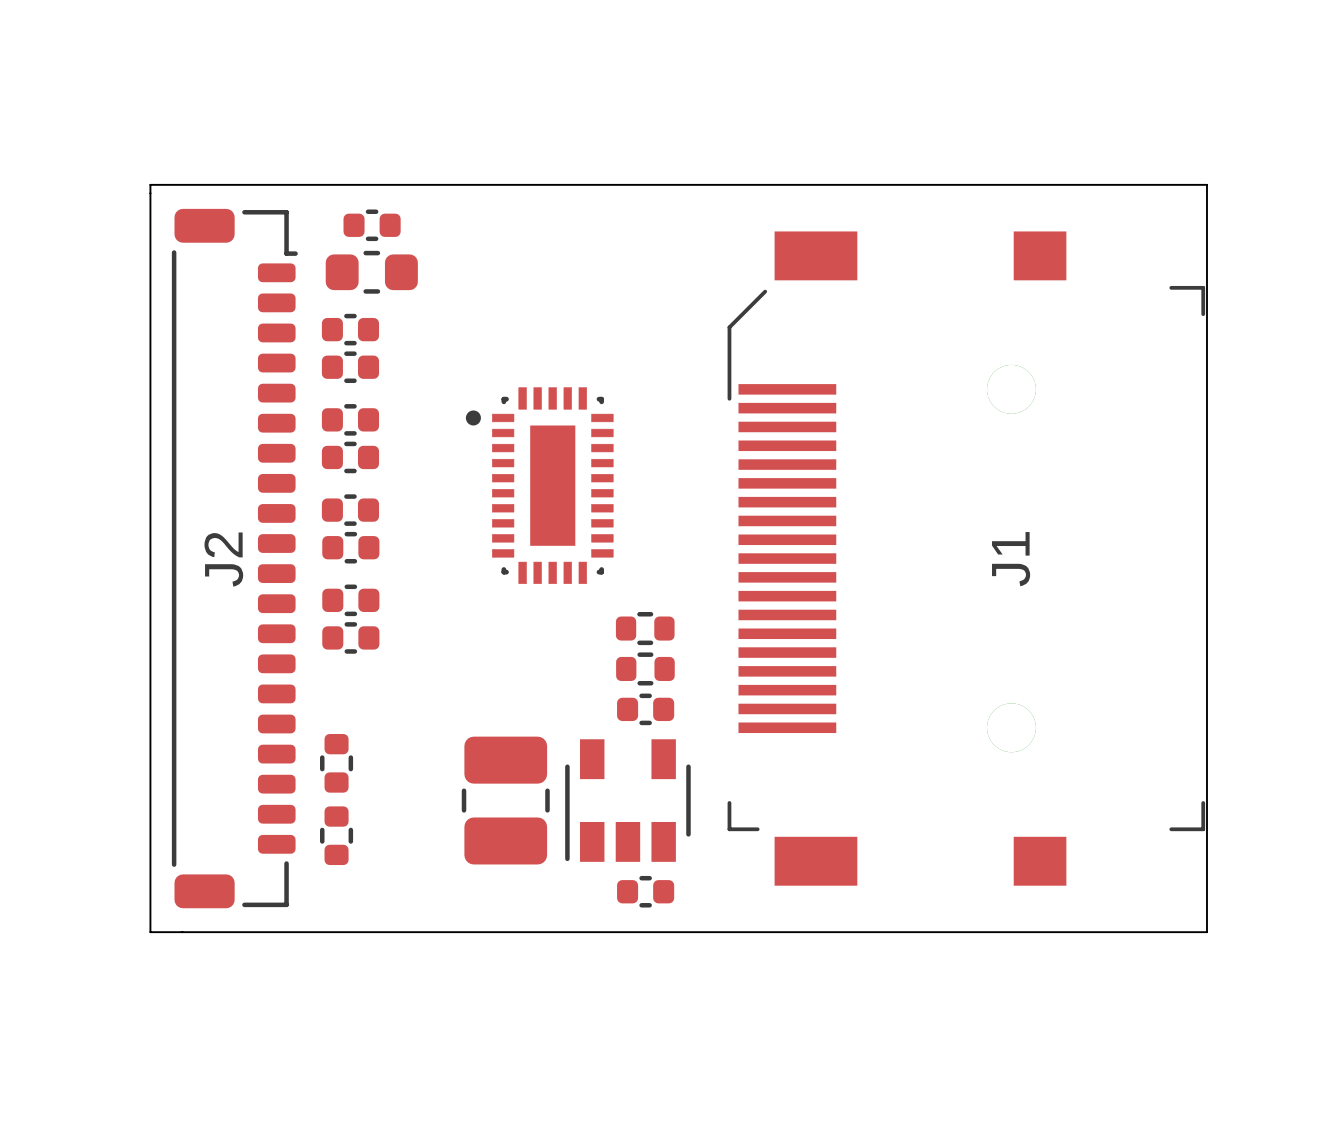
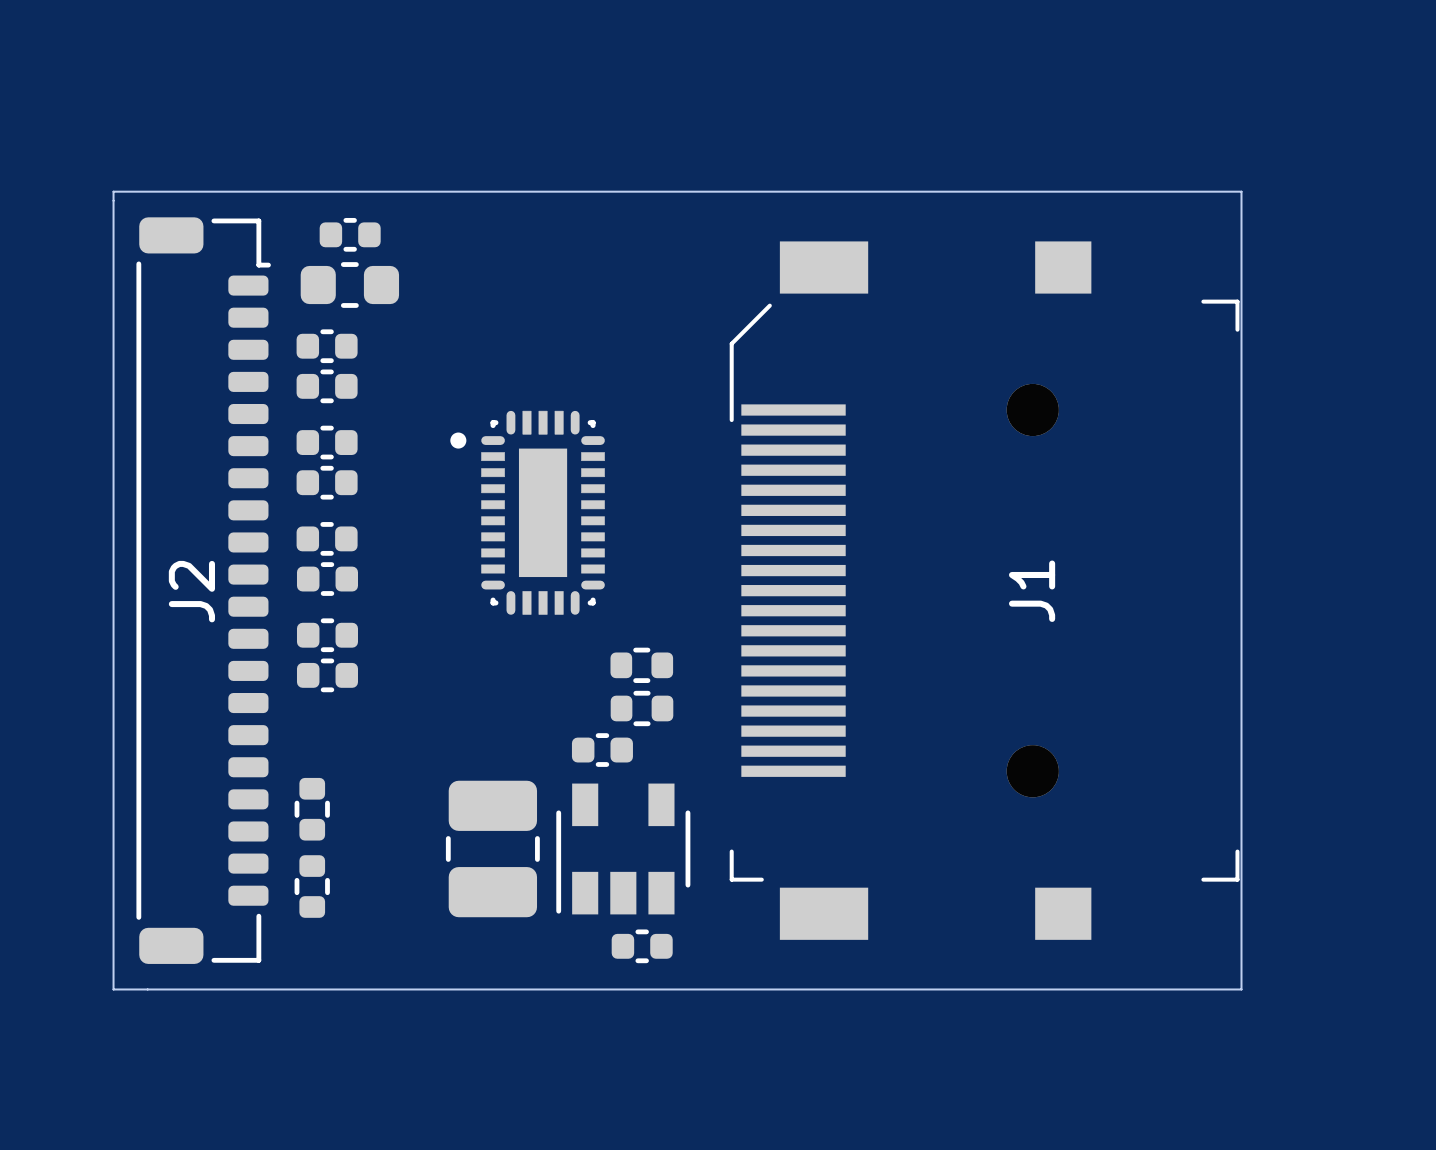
part footprint: [465, 387, 614, 584] -> [450, 410, 605, 615]
part position: (645, 709) -> (602, 750)

